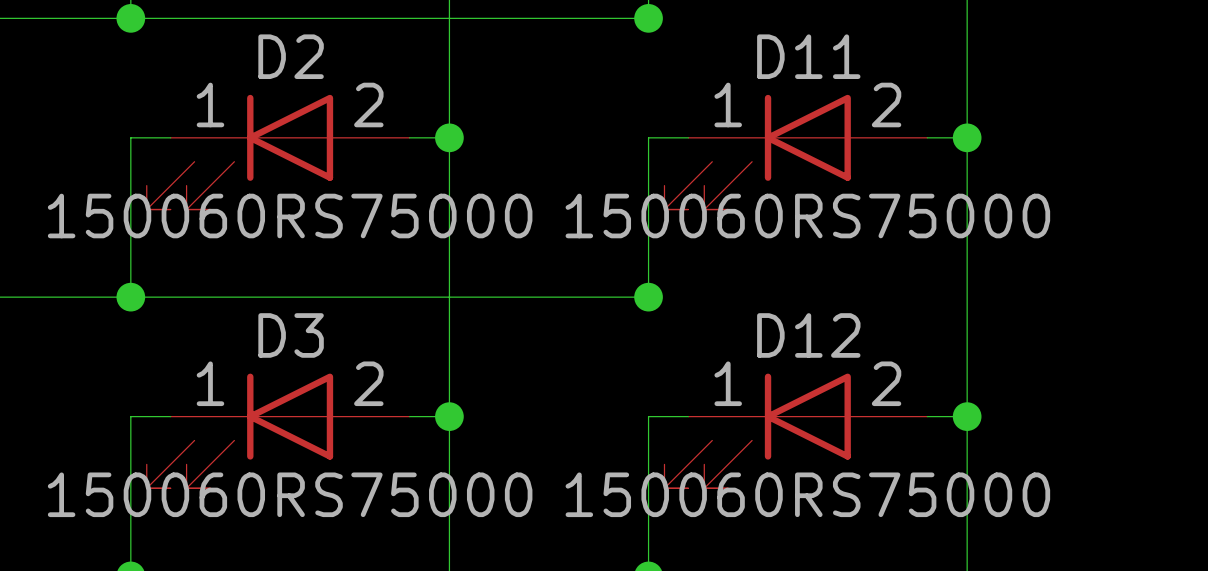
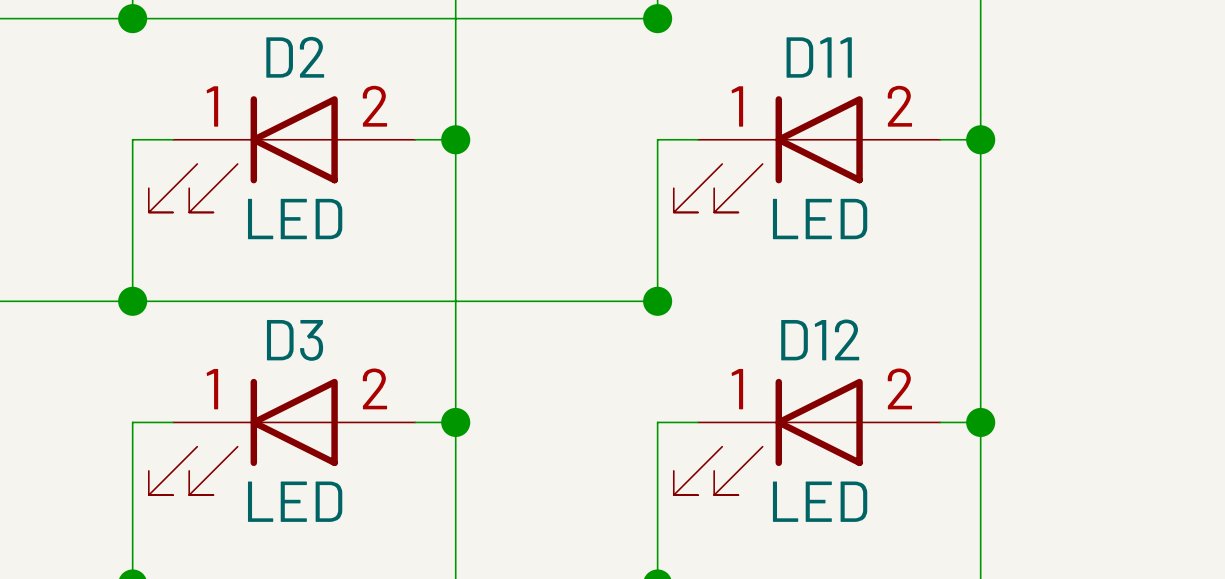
D2 value: 150060RS75000 (290, 216) -> LED (295, 219)
D11 value: 150060RS75000 (807, 216) -> LED (820, 219)
D3 value: 150060RS75000 (290, 494) -> LED (295, 501)
D12 value: 150060RS75000 (807, 494) -> LED (820, 501)

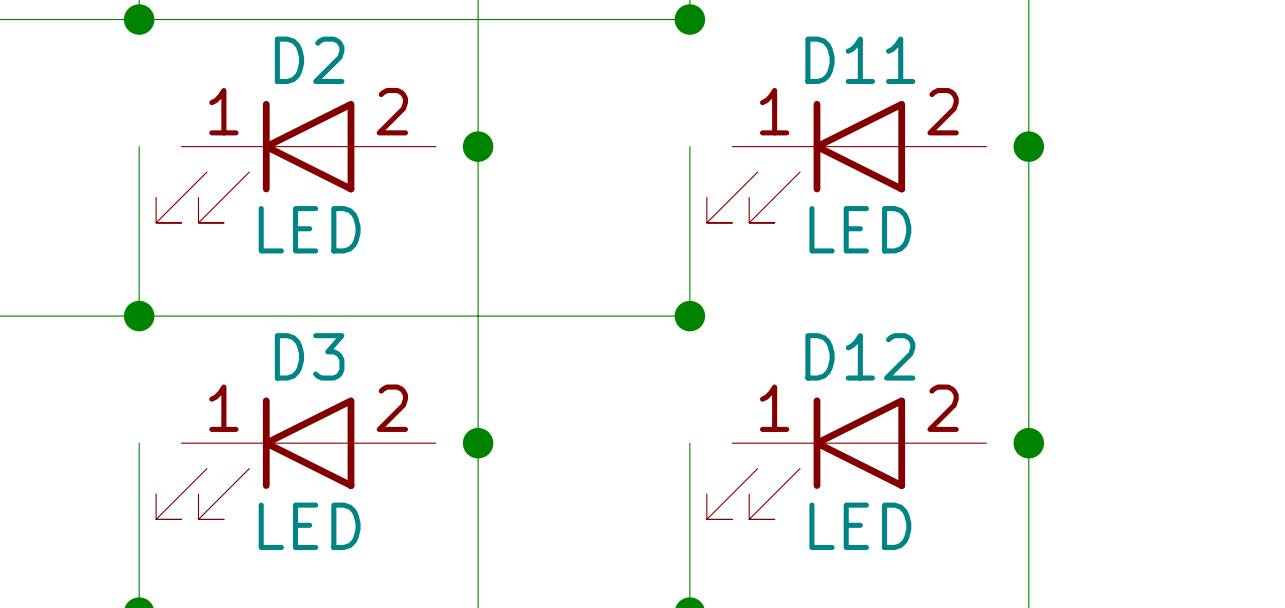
wire: (132, 139) (173, 139) -> none
wire: (415, 139) (455, 139) -> none
wire: (657, 139) (698, 139) -> none
wire: (940, 139) (980, 139) -> none
wire: (132, 422) (173, 422) -> none
wire: (415, 422) (455, 422) -> none
wire: (657, 422) (698, 422) -> none
wire: (940, 422) (980, 422) -> none

